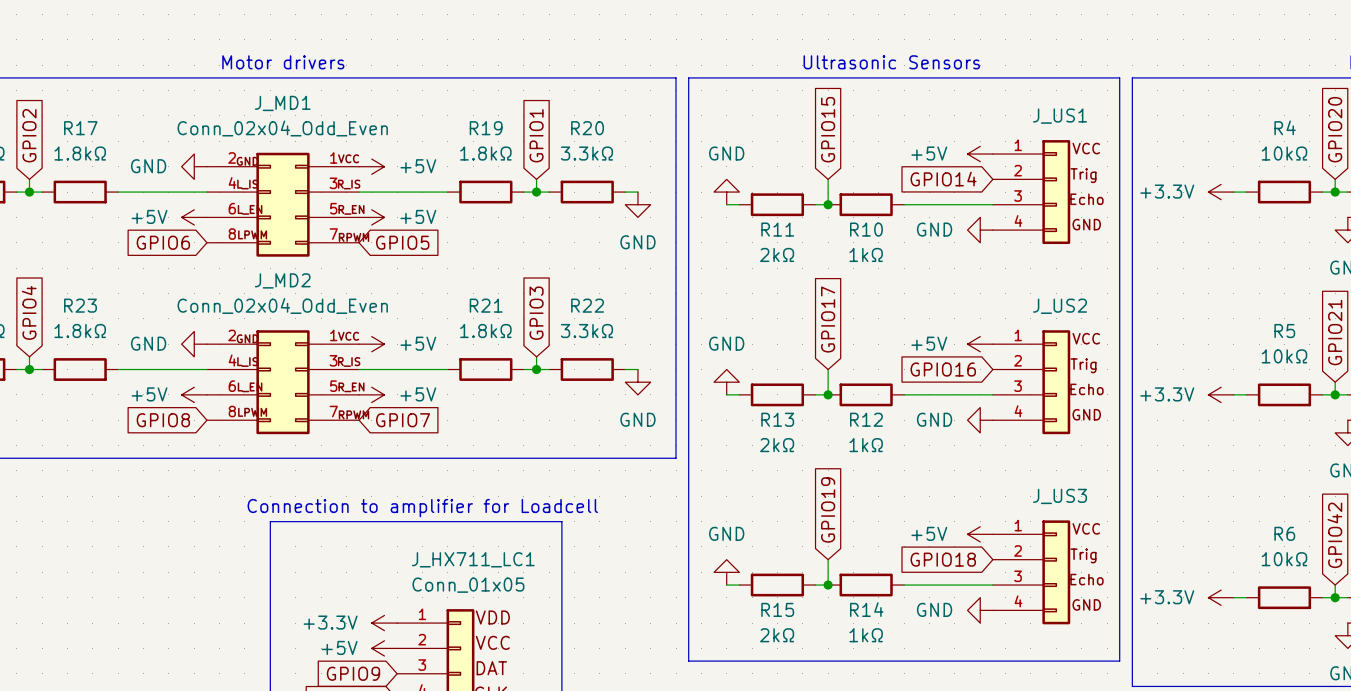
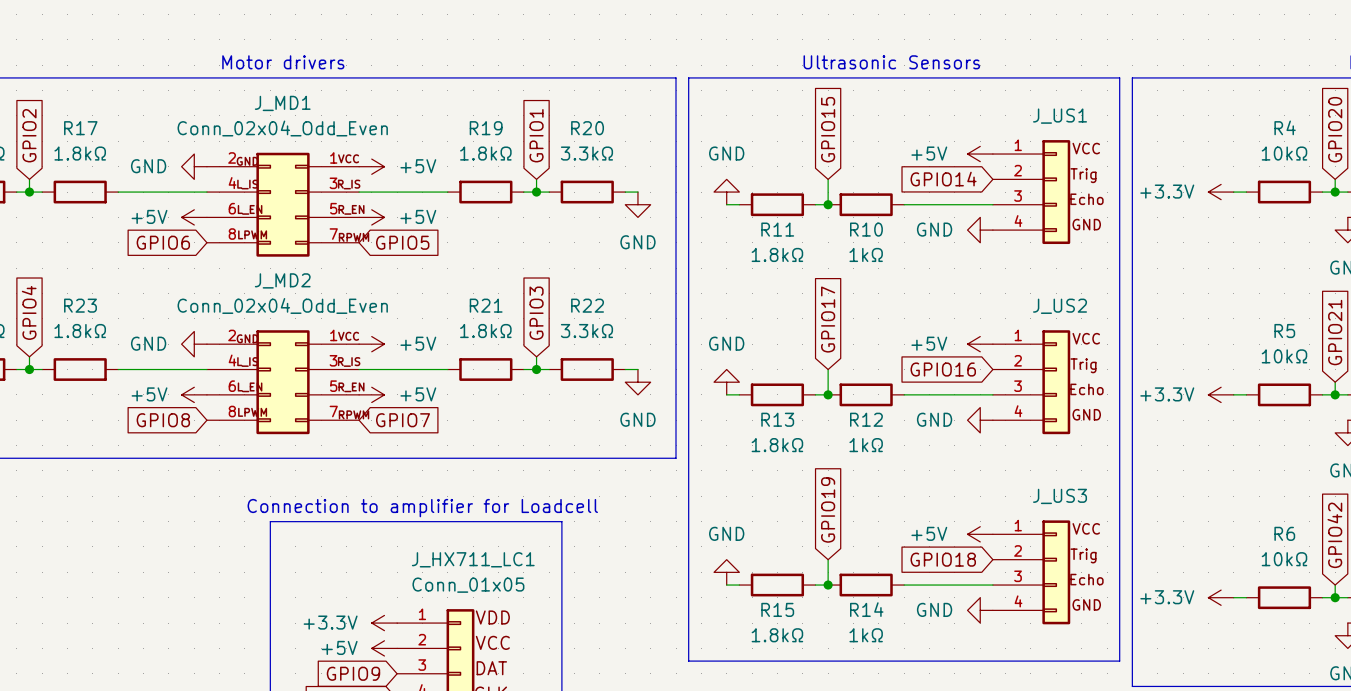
R11 value: 2kΩ (777, 254) -> 1.8kΩ (777, 254)
R13 value: 2kΩ (777, 445) -> 1.8kΩ (777, 445)
R15 value: 2kΩ (777, 635) -> 1.8kΩ (777, 635)

